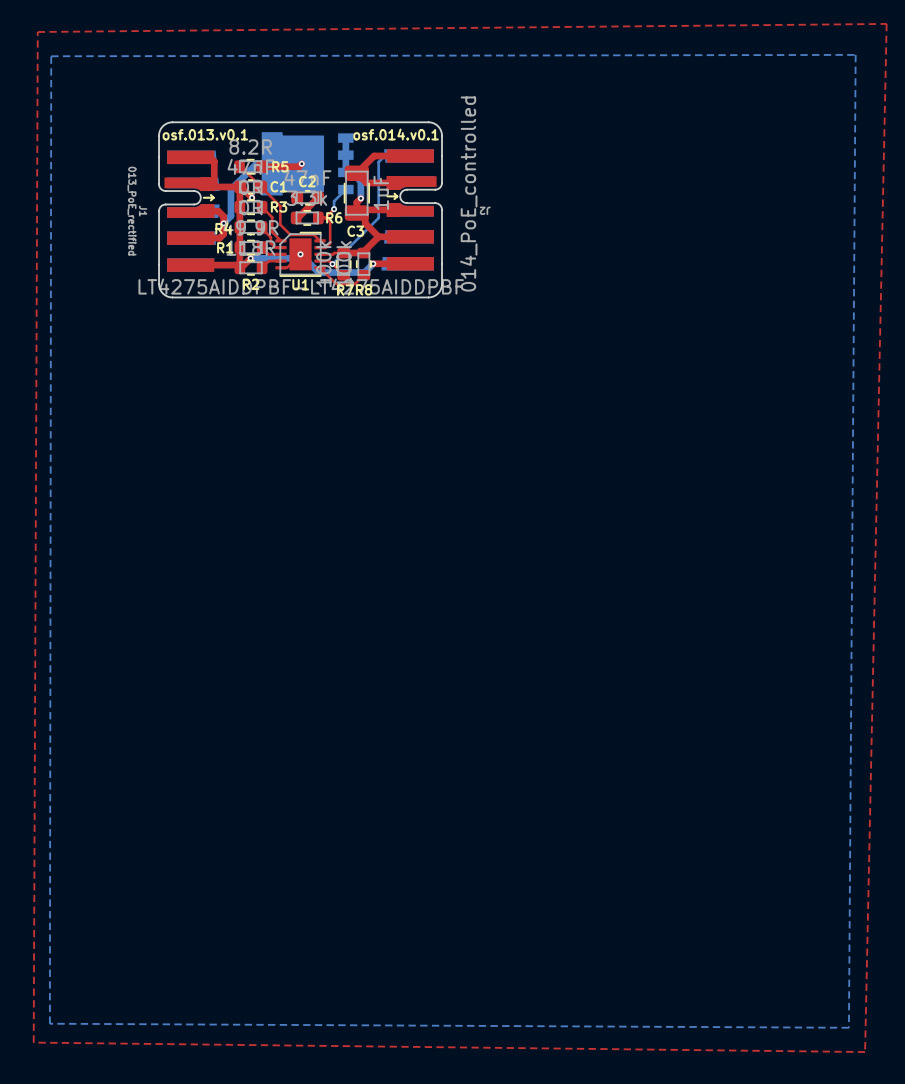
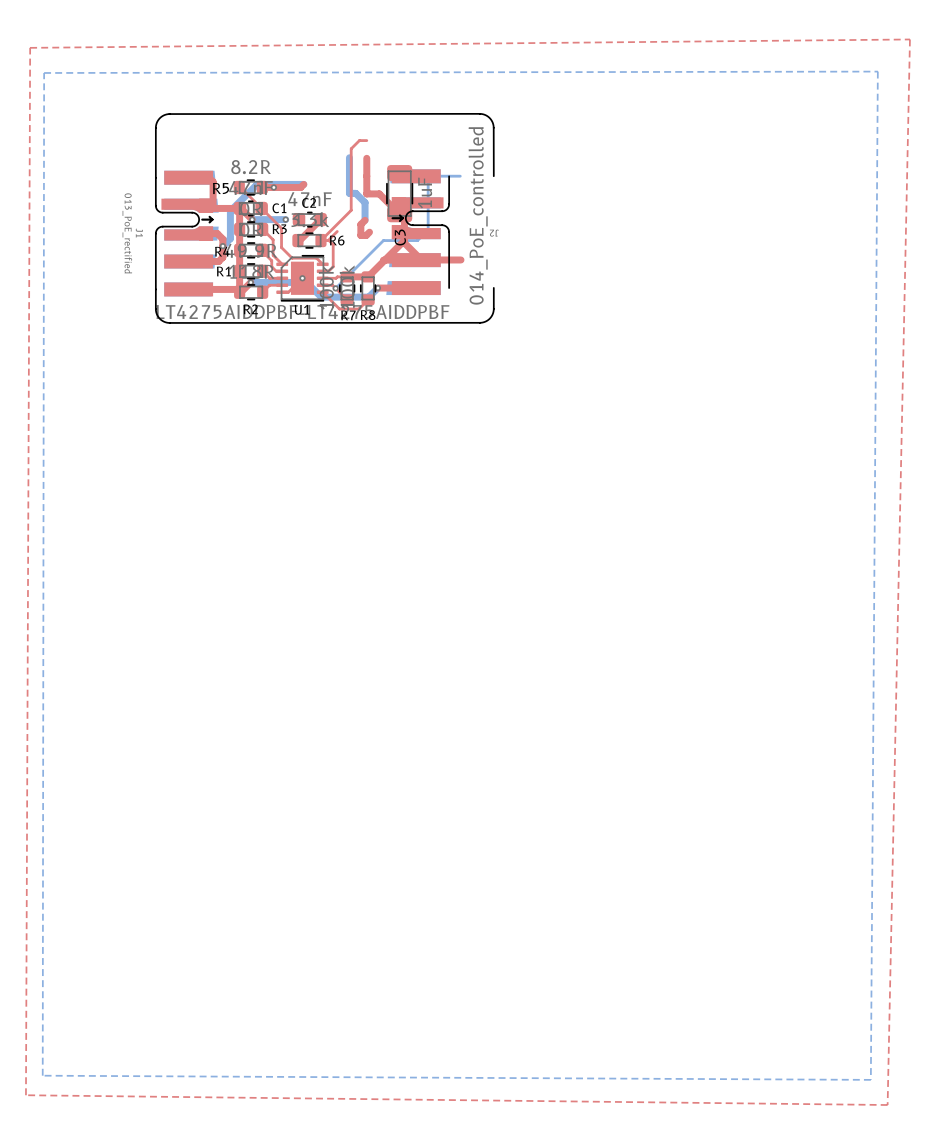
board edge: none -> (169, 114) (482, 114) (489, 117) (493, 124) (493, 176)
top track: none -> (366, 140) (359, 140) (351, 148) (351, 210) (320, 240)
text: osf.013.v0.1 (205, 134) -> none
text: osf.014.v0.1 (396, 134) -> none
board edge: (159, 135) (162, 126) (172, 122) (430, 122) (436, 125) (441, 131) (442, 155) -> (155, 155) (156, 123) (161, 117) (169, 114)
top track: none -> (366, 158) (366, 193) (379, 193) (404, 218) (404, 242) (421, 259) (460, 259)
bottom track: (409, 155) (384, 155) (378, 162) (378, 217) -> (460, 176) (434, 176) (428, 182) (428, 229) (417, 240) (383, 240)
top track: (410, 155) (374, 155) (356, 173) (366, 182) (393, 182) -> none
via: (301, 163) -> none
part: (307, 163) -> none
via: none -> (273, 187)
R5 name position: R5 (280, 166) -> R5 (220, 188)
bottom track: (345, 189) (334, 201) (334, 209) -> none
C3 position: (356, 193) -> (399, 193)
bottom track: none -> (252, 219) (285, 219)
via: none -> (285, 219)
via: (360, 198) -> none
via: (334, 209) -> none
top track: (393, 209) (365, 209) (365, 223) (378, 236) (363, 252) -> (404, 240) (368, 276)
C3 name rotation: 0° (355, 231) -> 90° counterclockwise (400, 237)
board edge: (442, 263) (441, 288) (436, 294) (430, 297) (172, 297) -> (493, 287) (493, 313) (488, 319) (481, 322) (169, 322)

